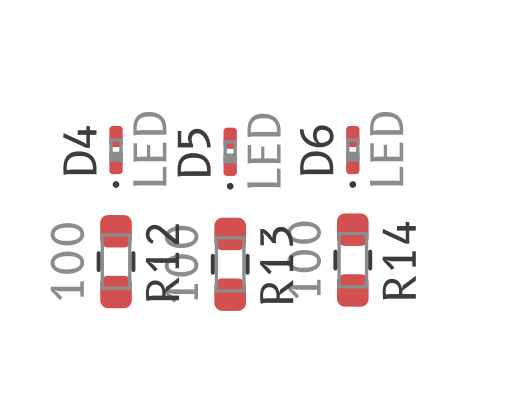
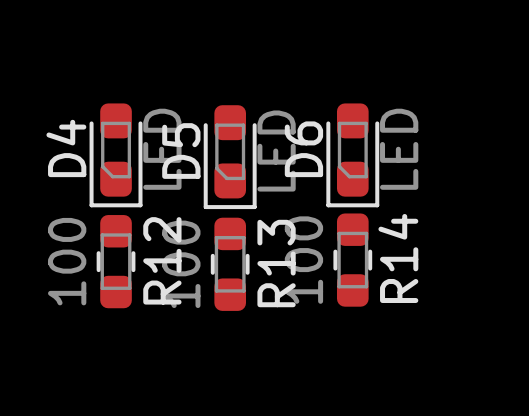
D4 footprint: [109, 125, 123, 188] -> [89, 103, 143, 208]
D6 footprint: [346, 125, 360, 188] -> [326, 103, 380, 208]
D5 footprint: [223, 127, 237, 190] -> [203, 105, 257, 210]

